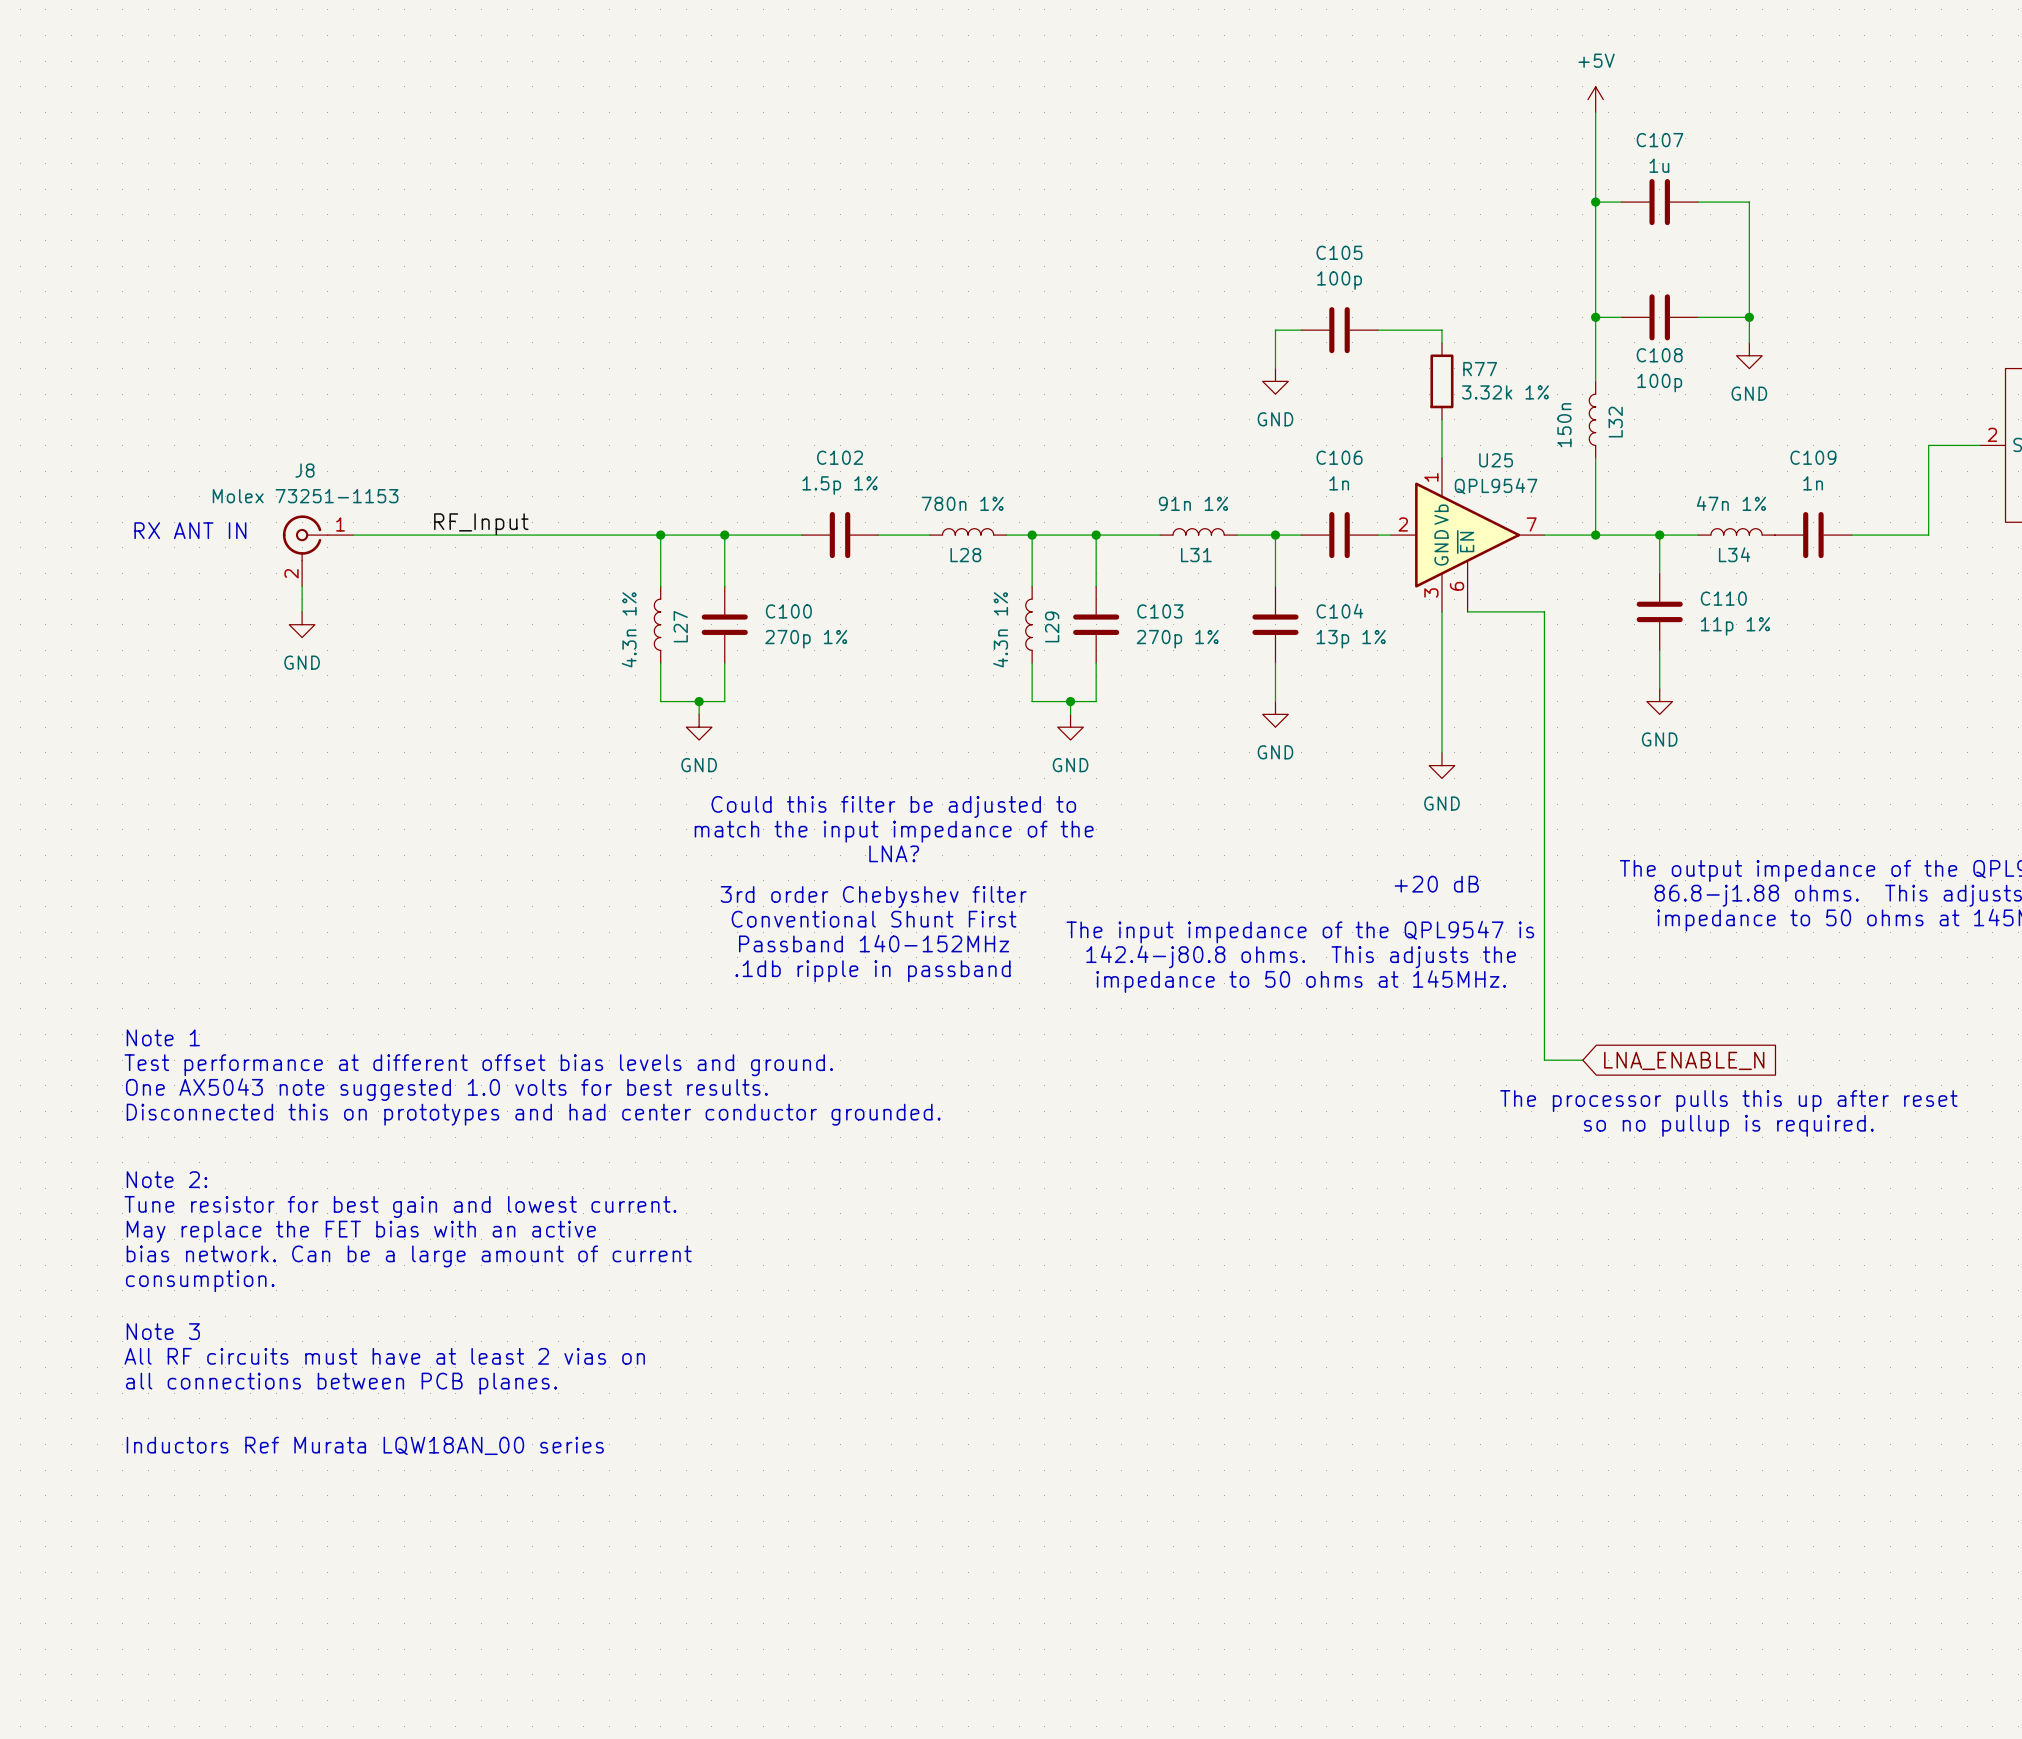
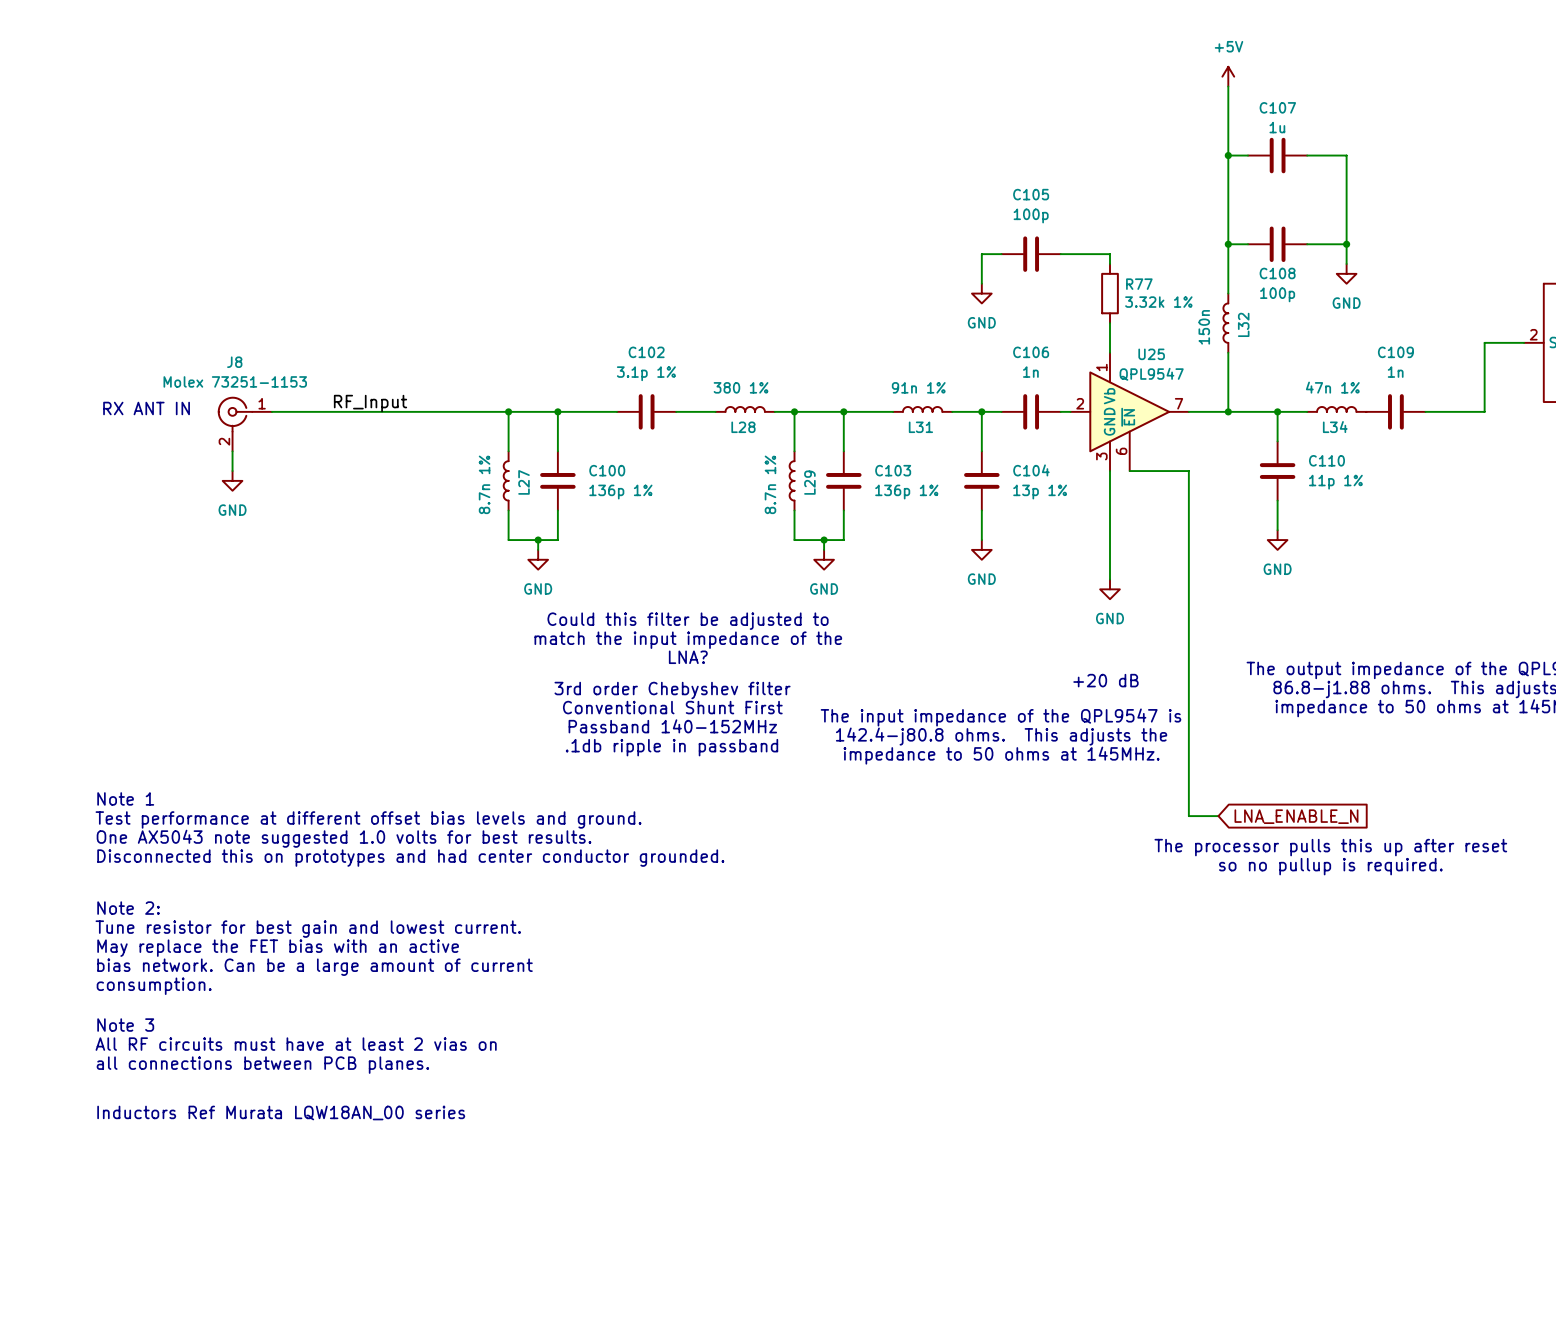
C102 value: 1.5p 1% (840, 485) -> 3.1p 1% (646, 373)
L28 value: 780n 1% (962, 503) -> 380 1% (741, 387)
L27 value: 4.3n 1% (629, 629) -> 8.7n 1% (484, 484)
L29 value: 4.3n 1% (1000, 629) -> 8.7n 1% (770, 484)
C100 value: 270p 1% (806, 639) -> 136p 1% (620, 492)
C103 value: 270p 1% (1177, 639) -> 136p 1% (906, 492)

